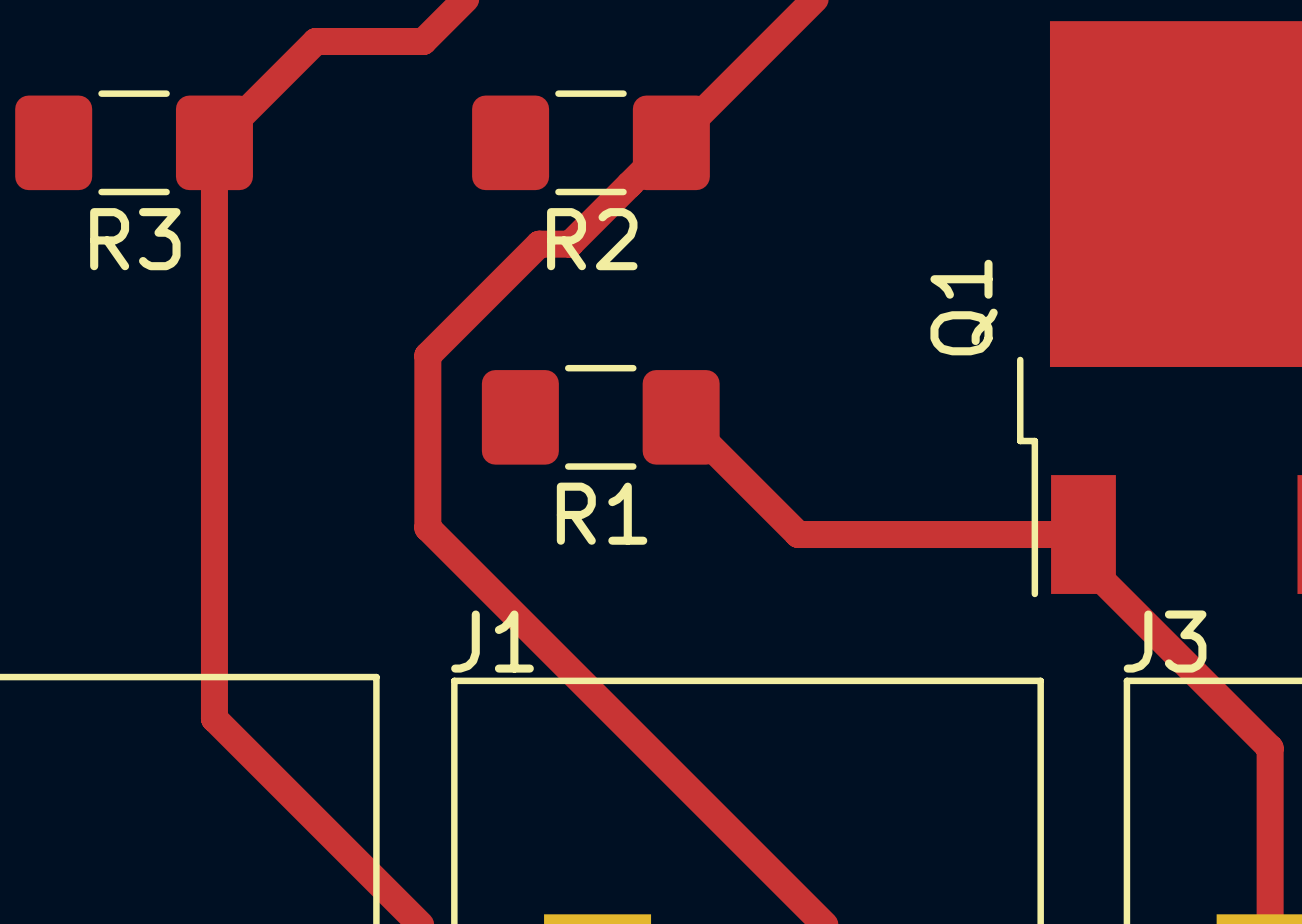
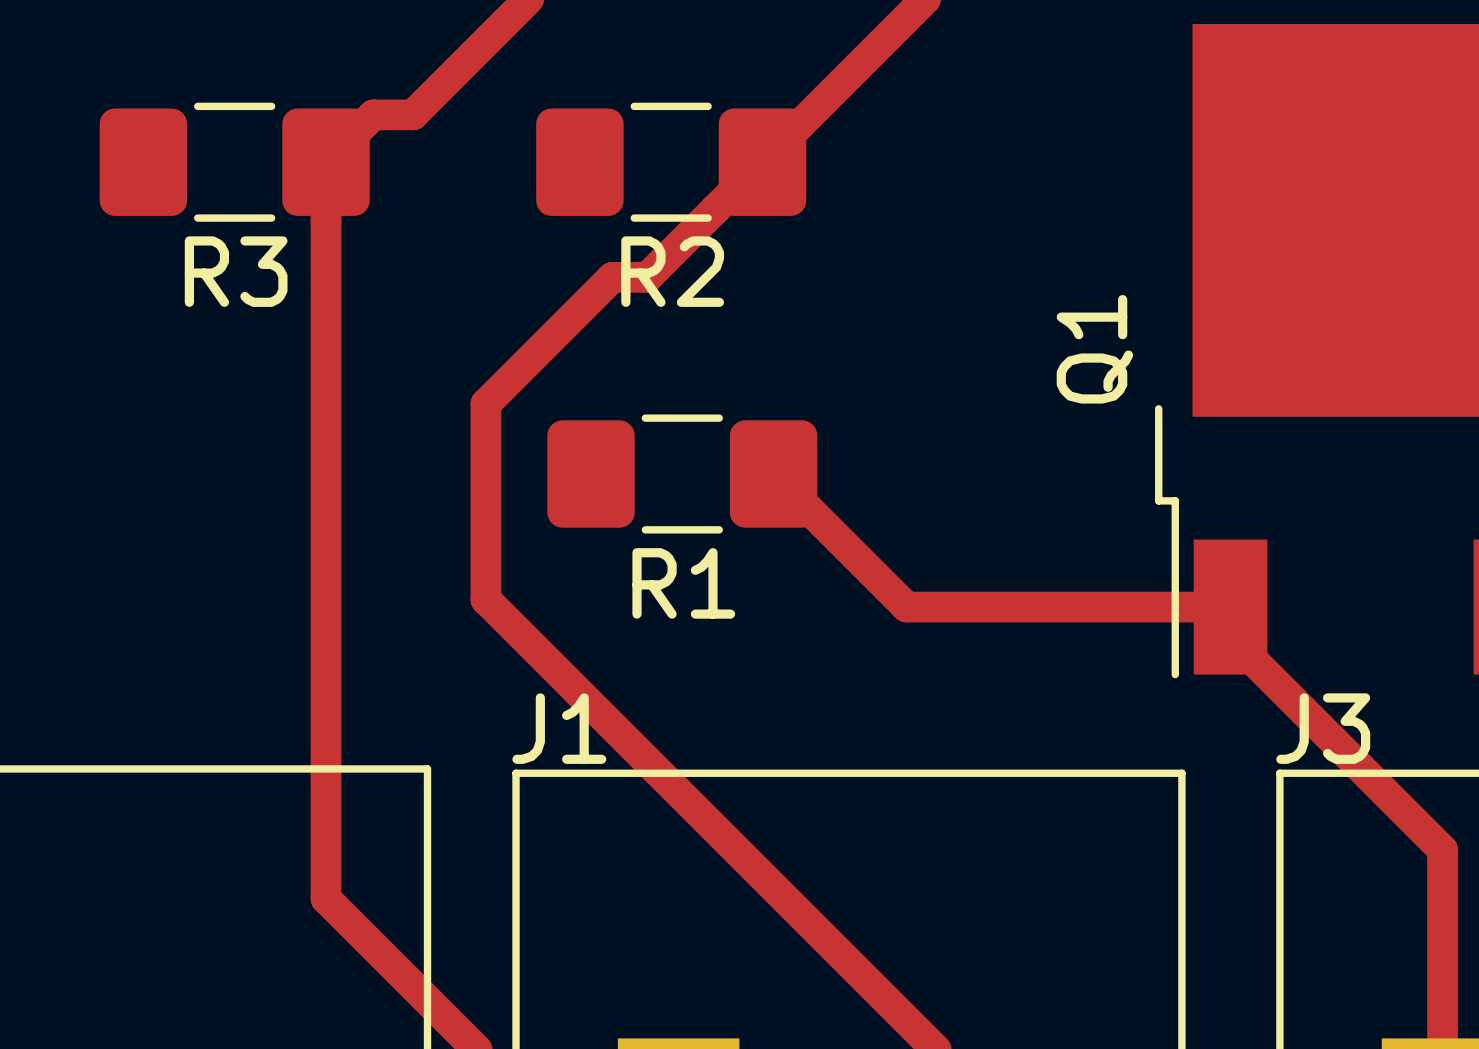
top track: (423, 41) (315, 41) (214, 142) (214, 718) (287, 791) -> (480, 47) (412, 114) (373, 114) (325, 162) (325, 898)
R3 position: (134, 142) -> (234, 162)

